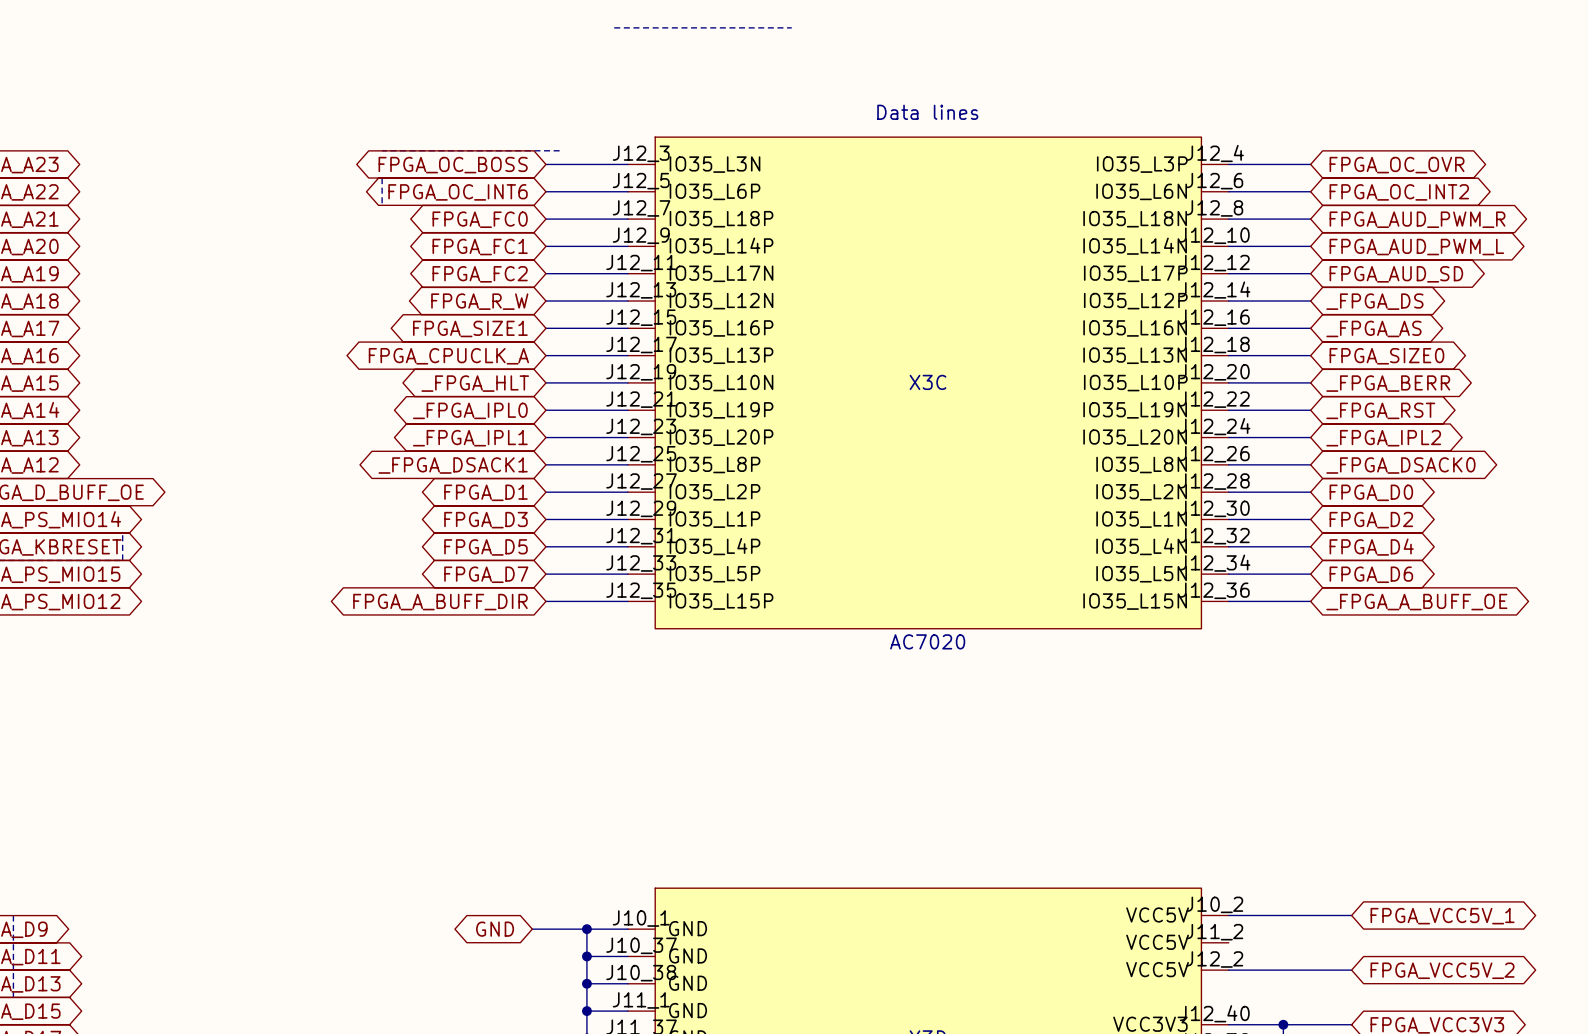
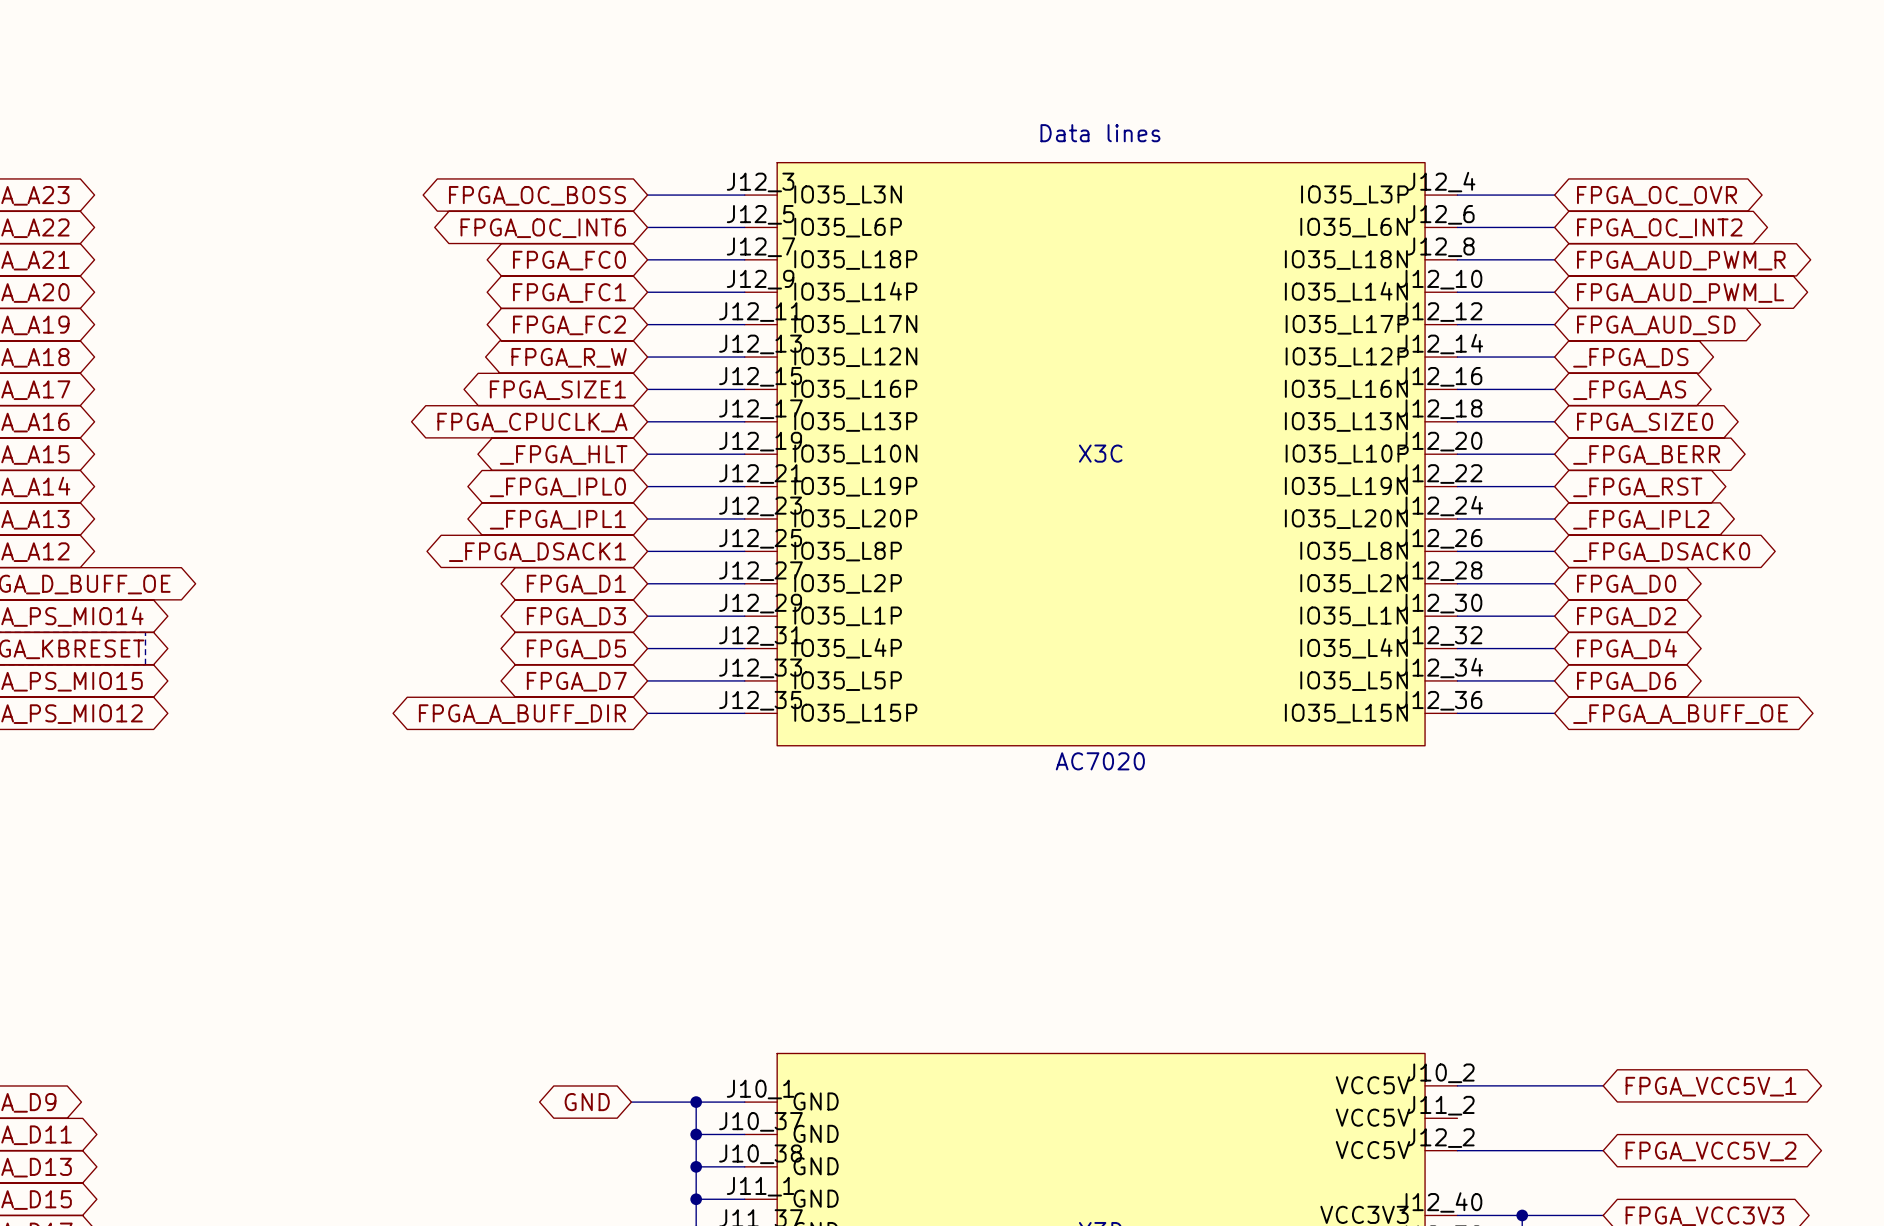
line: (614, 27) (791, 27) -> none
line: (382, 150) (559, 150) -> none
line: (382, 178) (382, 205) -> none
line: (13, 915) (13, 997) -> none

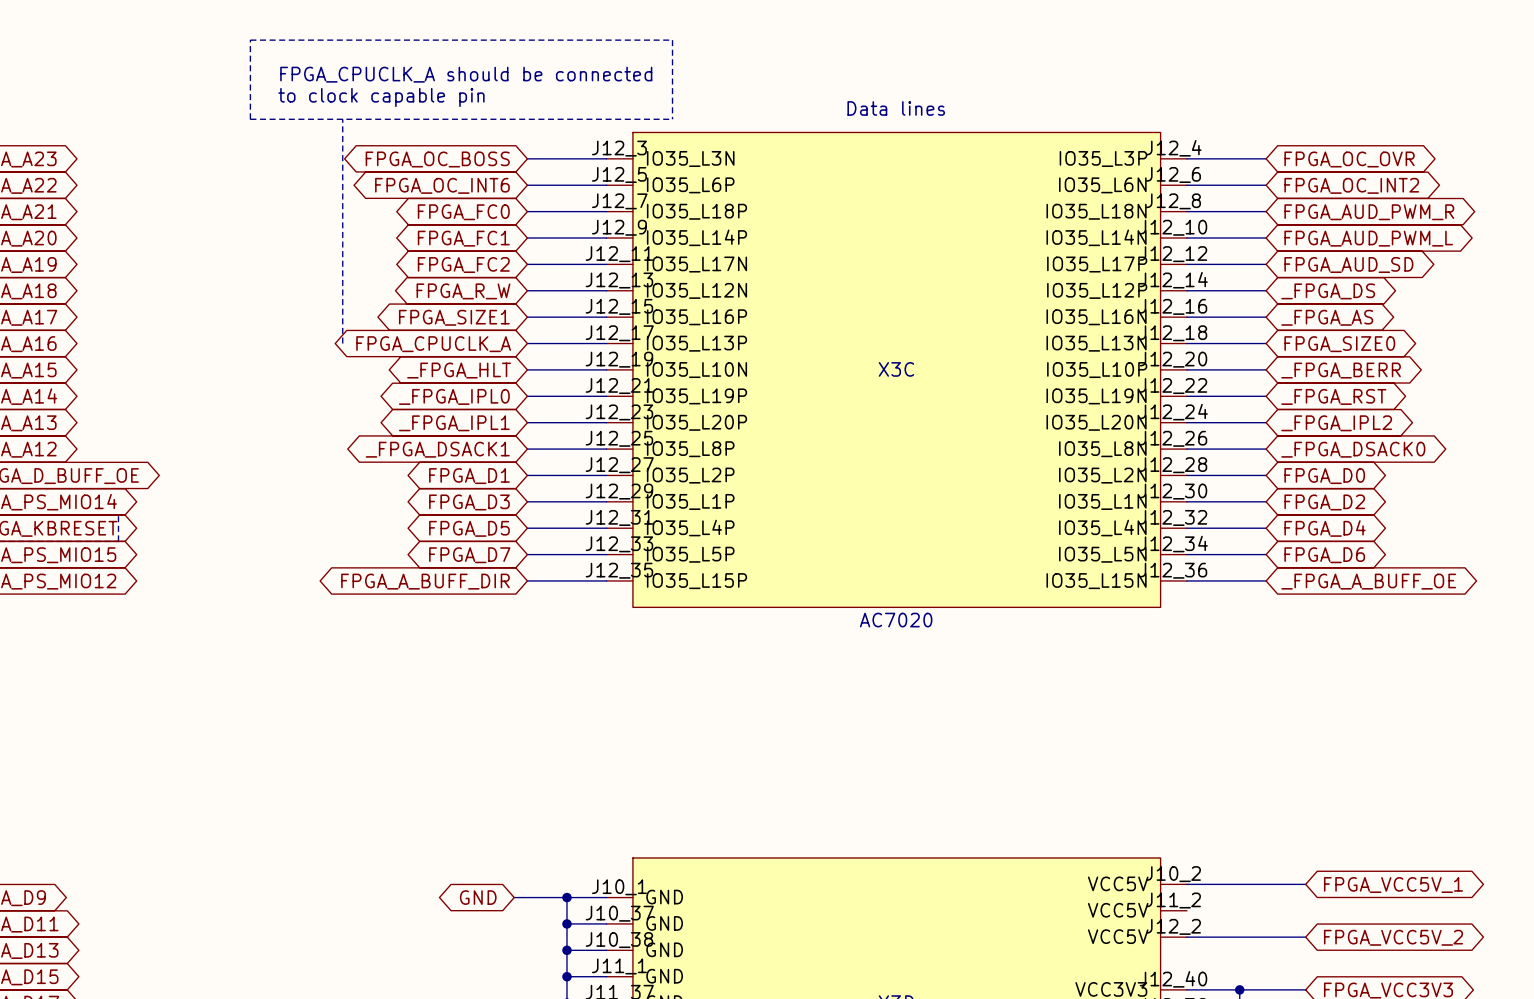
line: none -> (250, 40) (250, 119) (672, 119) (672, 40) (250, 40)
text: none -> FPGA_CPUCLK_A should be connected (466, 74)
text: none -> to clock capable pin (381, 97)
line: none -> (342, 119) (342, 343)

